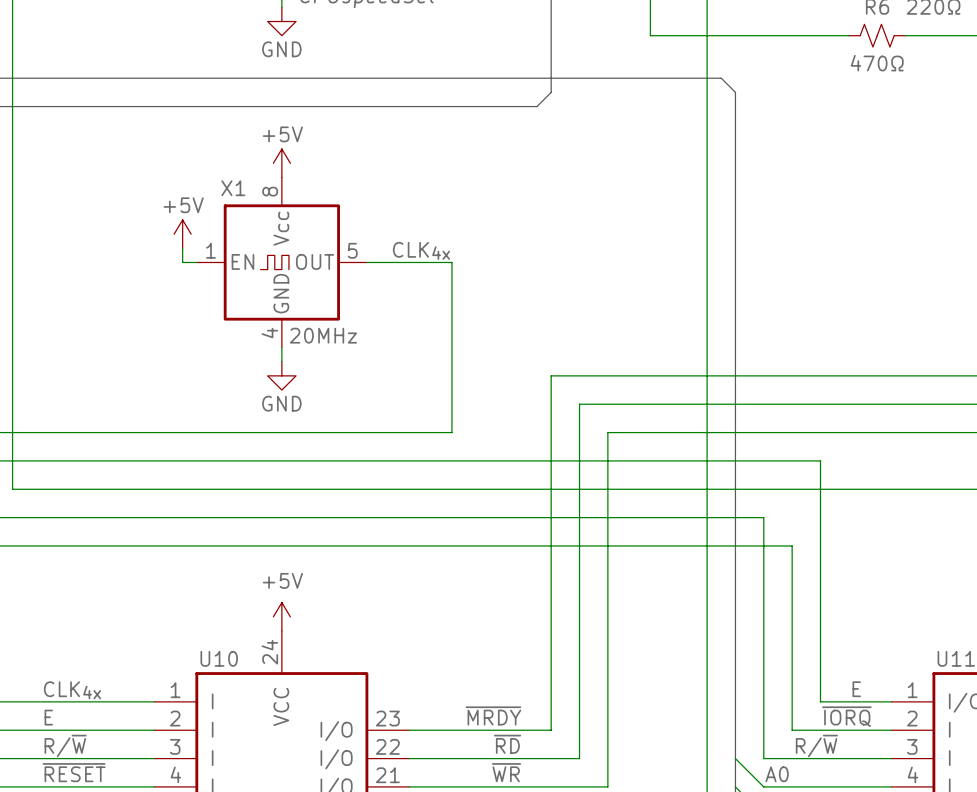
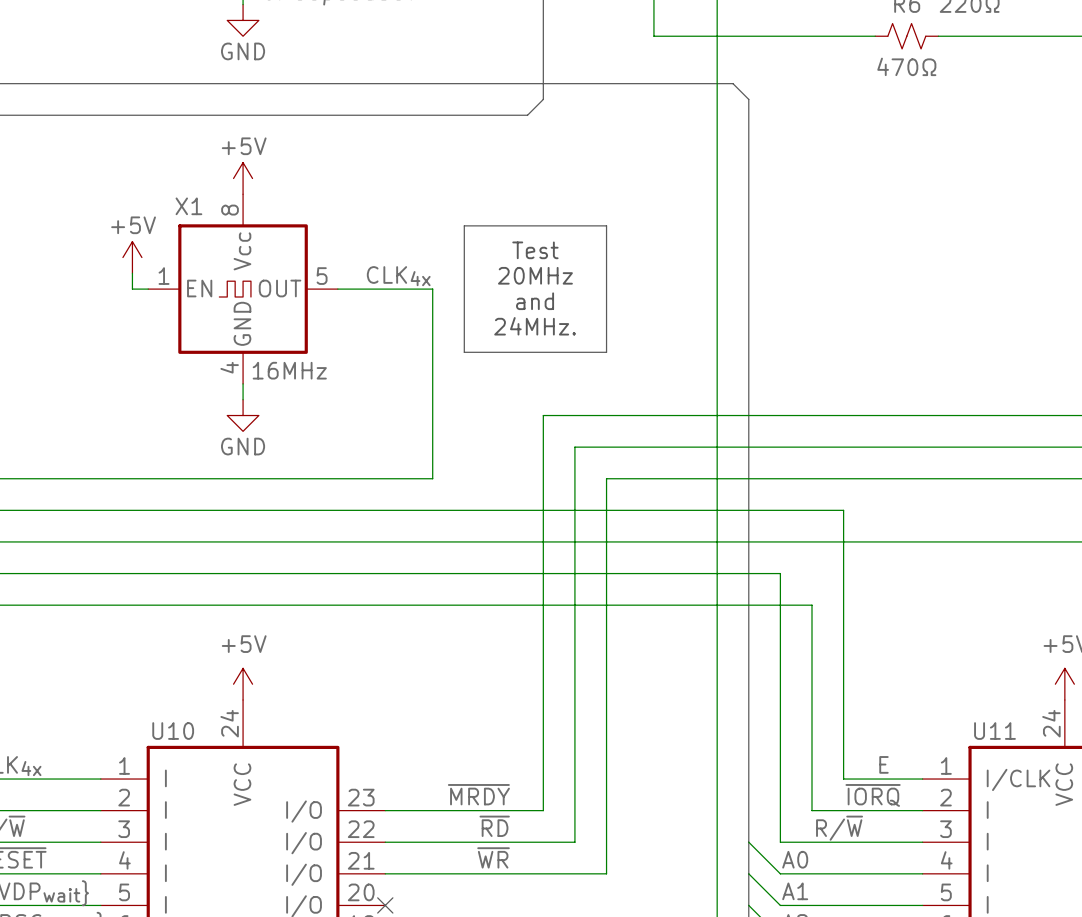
line: none -> (464, 225) (606, 225) (606, 352) (464, 352) (464, 225)
text: none -> Test (535, 250)
text: none -> 20MHz (535, 275)
text: none -> and (535, 301)
text: none -> 24MHz. (535, 326)
X1 value: 20MHz (323, 335) -> 16MHz (289, 370)

